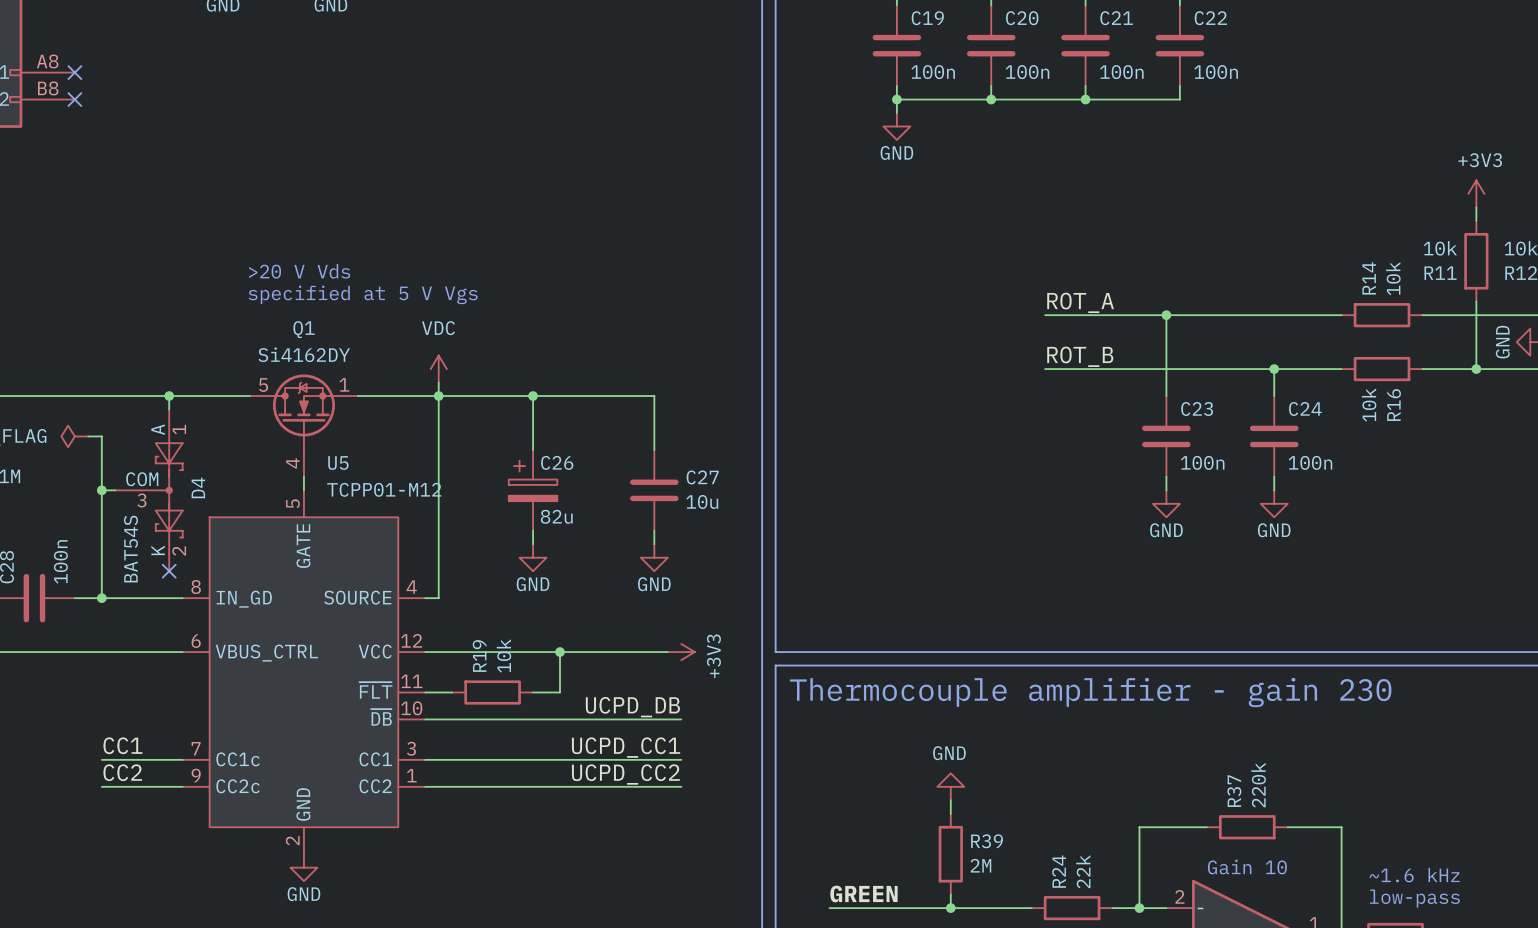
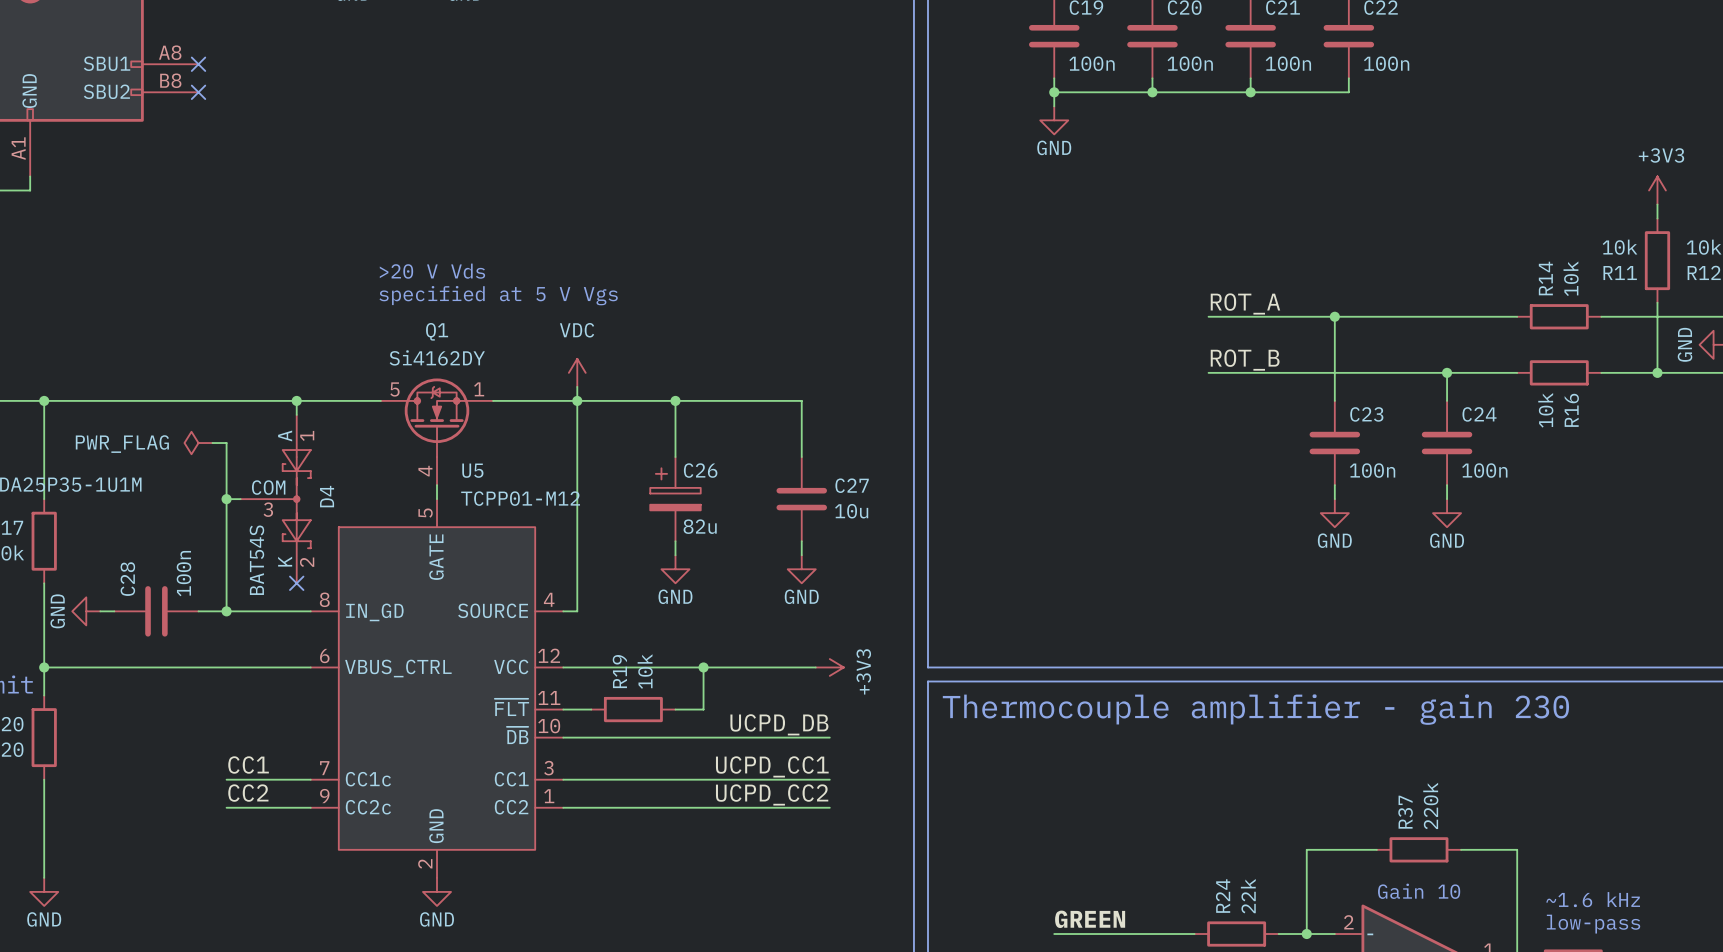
power symbol: GND (950, 786) -> none
wire: (950, 800) (950, 813) -> none
R39: 2M (950, 854) -> none
label position: GREEN (863, 893) -> GREEN (1090, 919)
wire: (950, 894) (950, 908) -> none
wire: (829, 908) (896, 908) -> none
junction: (950, 908) -> none

